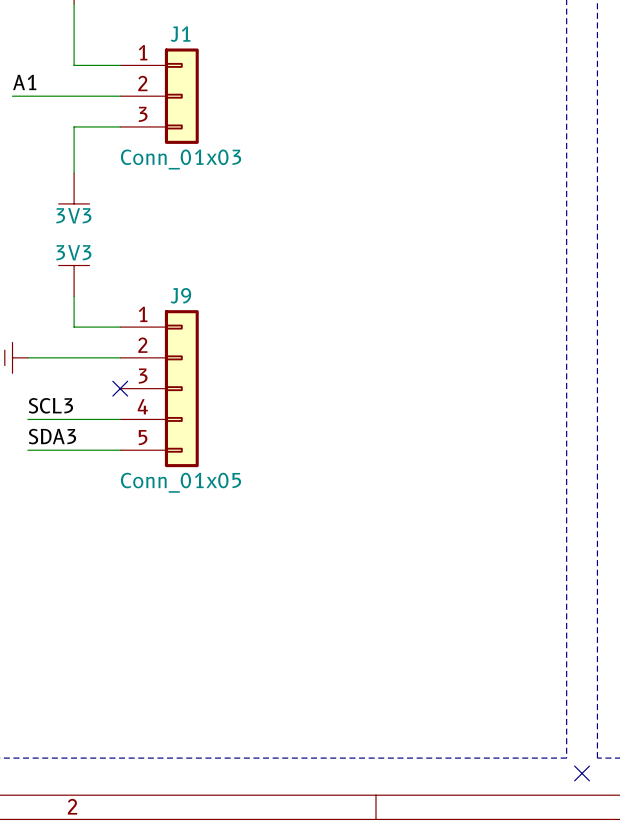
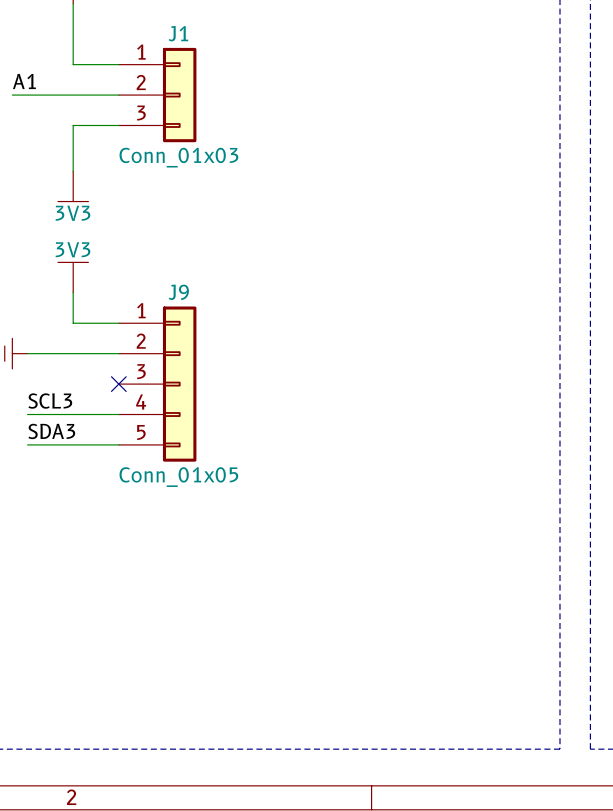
no-connect mark: (582, 773) -> none

